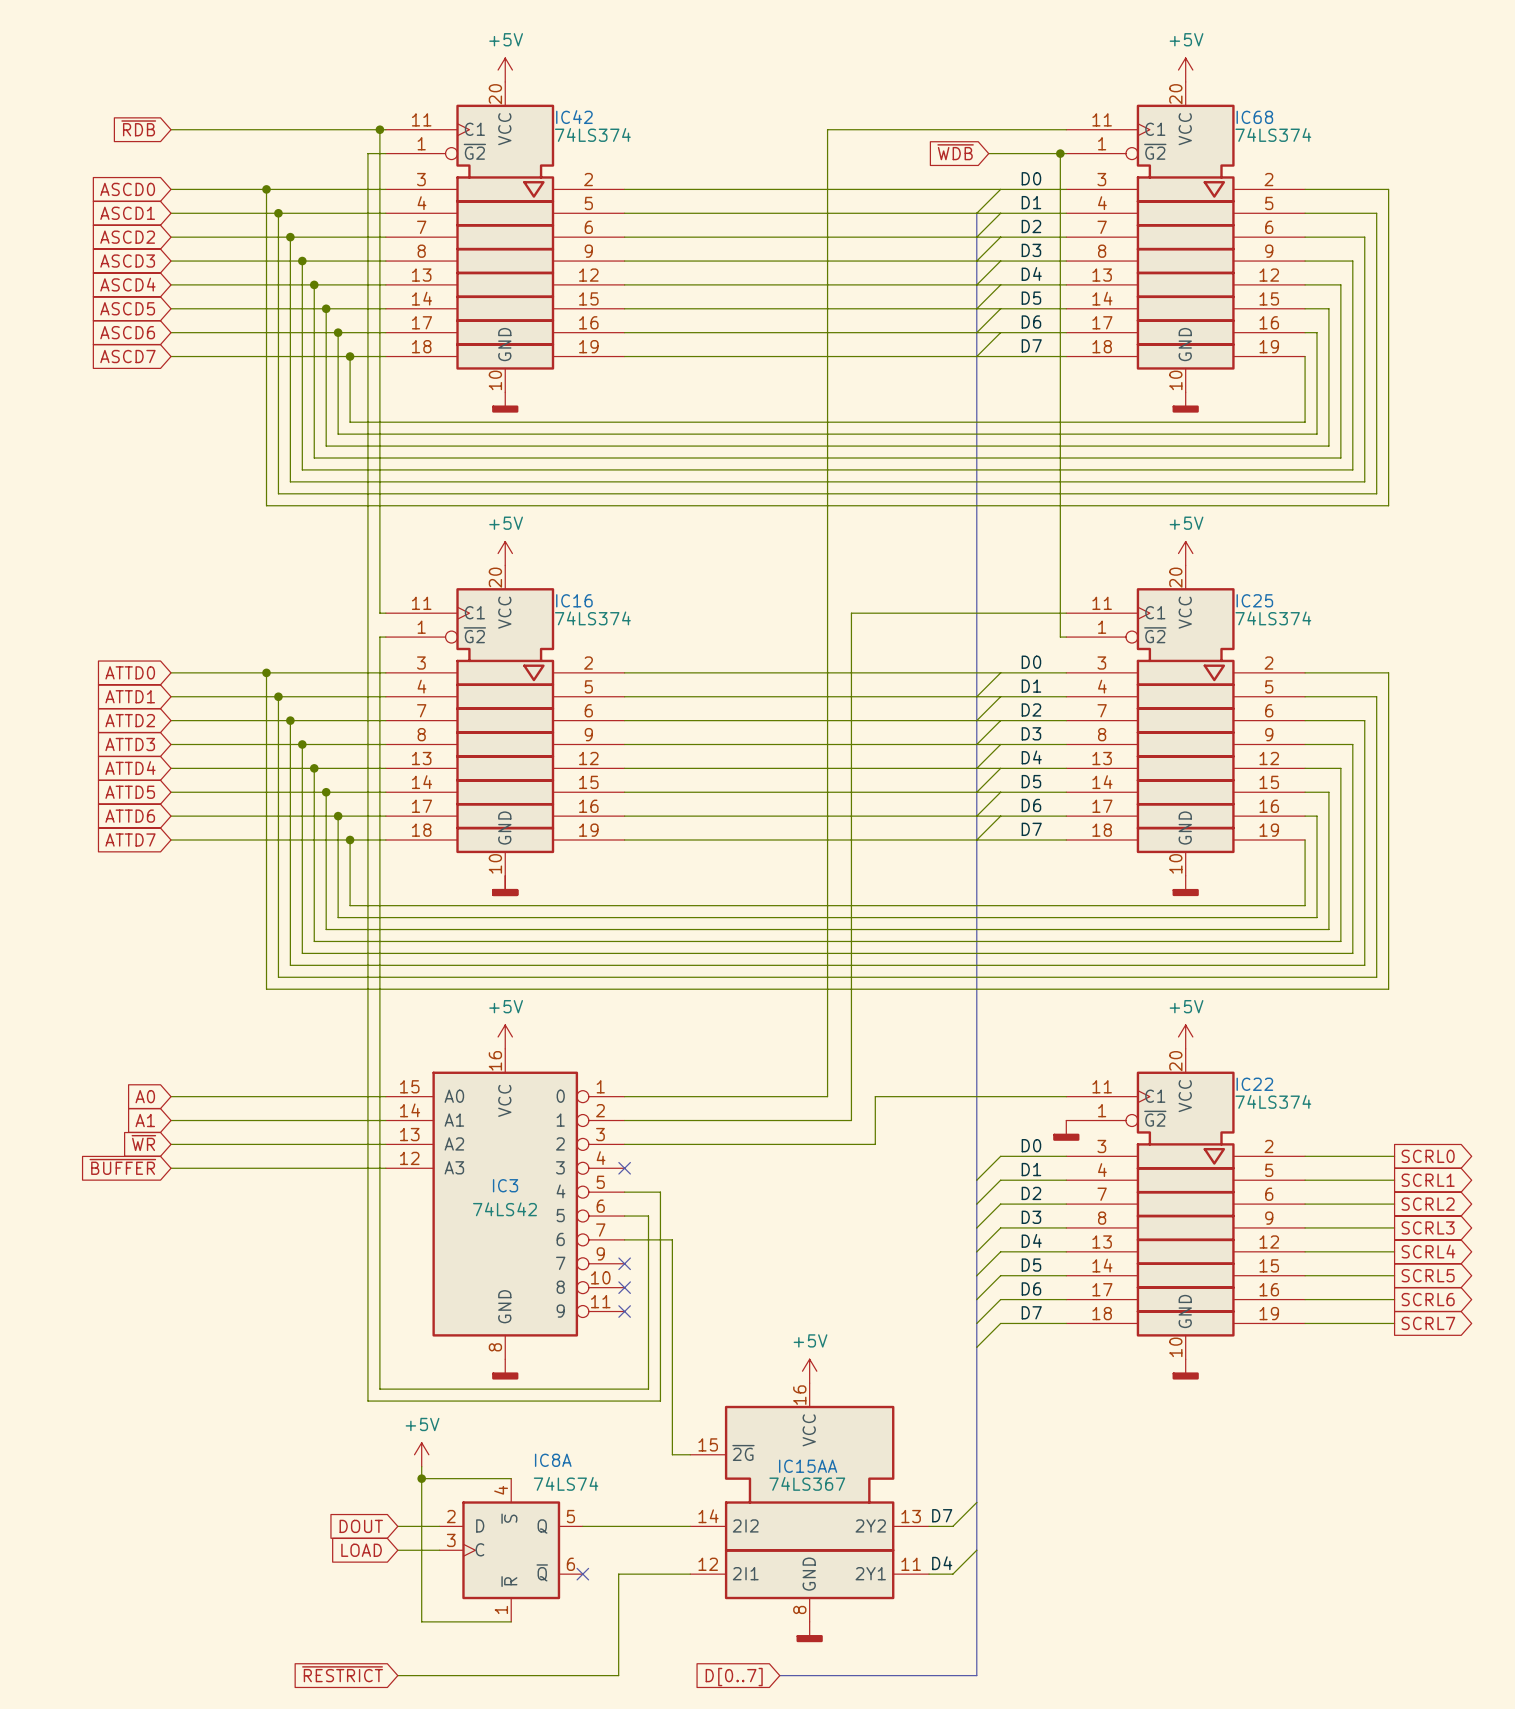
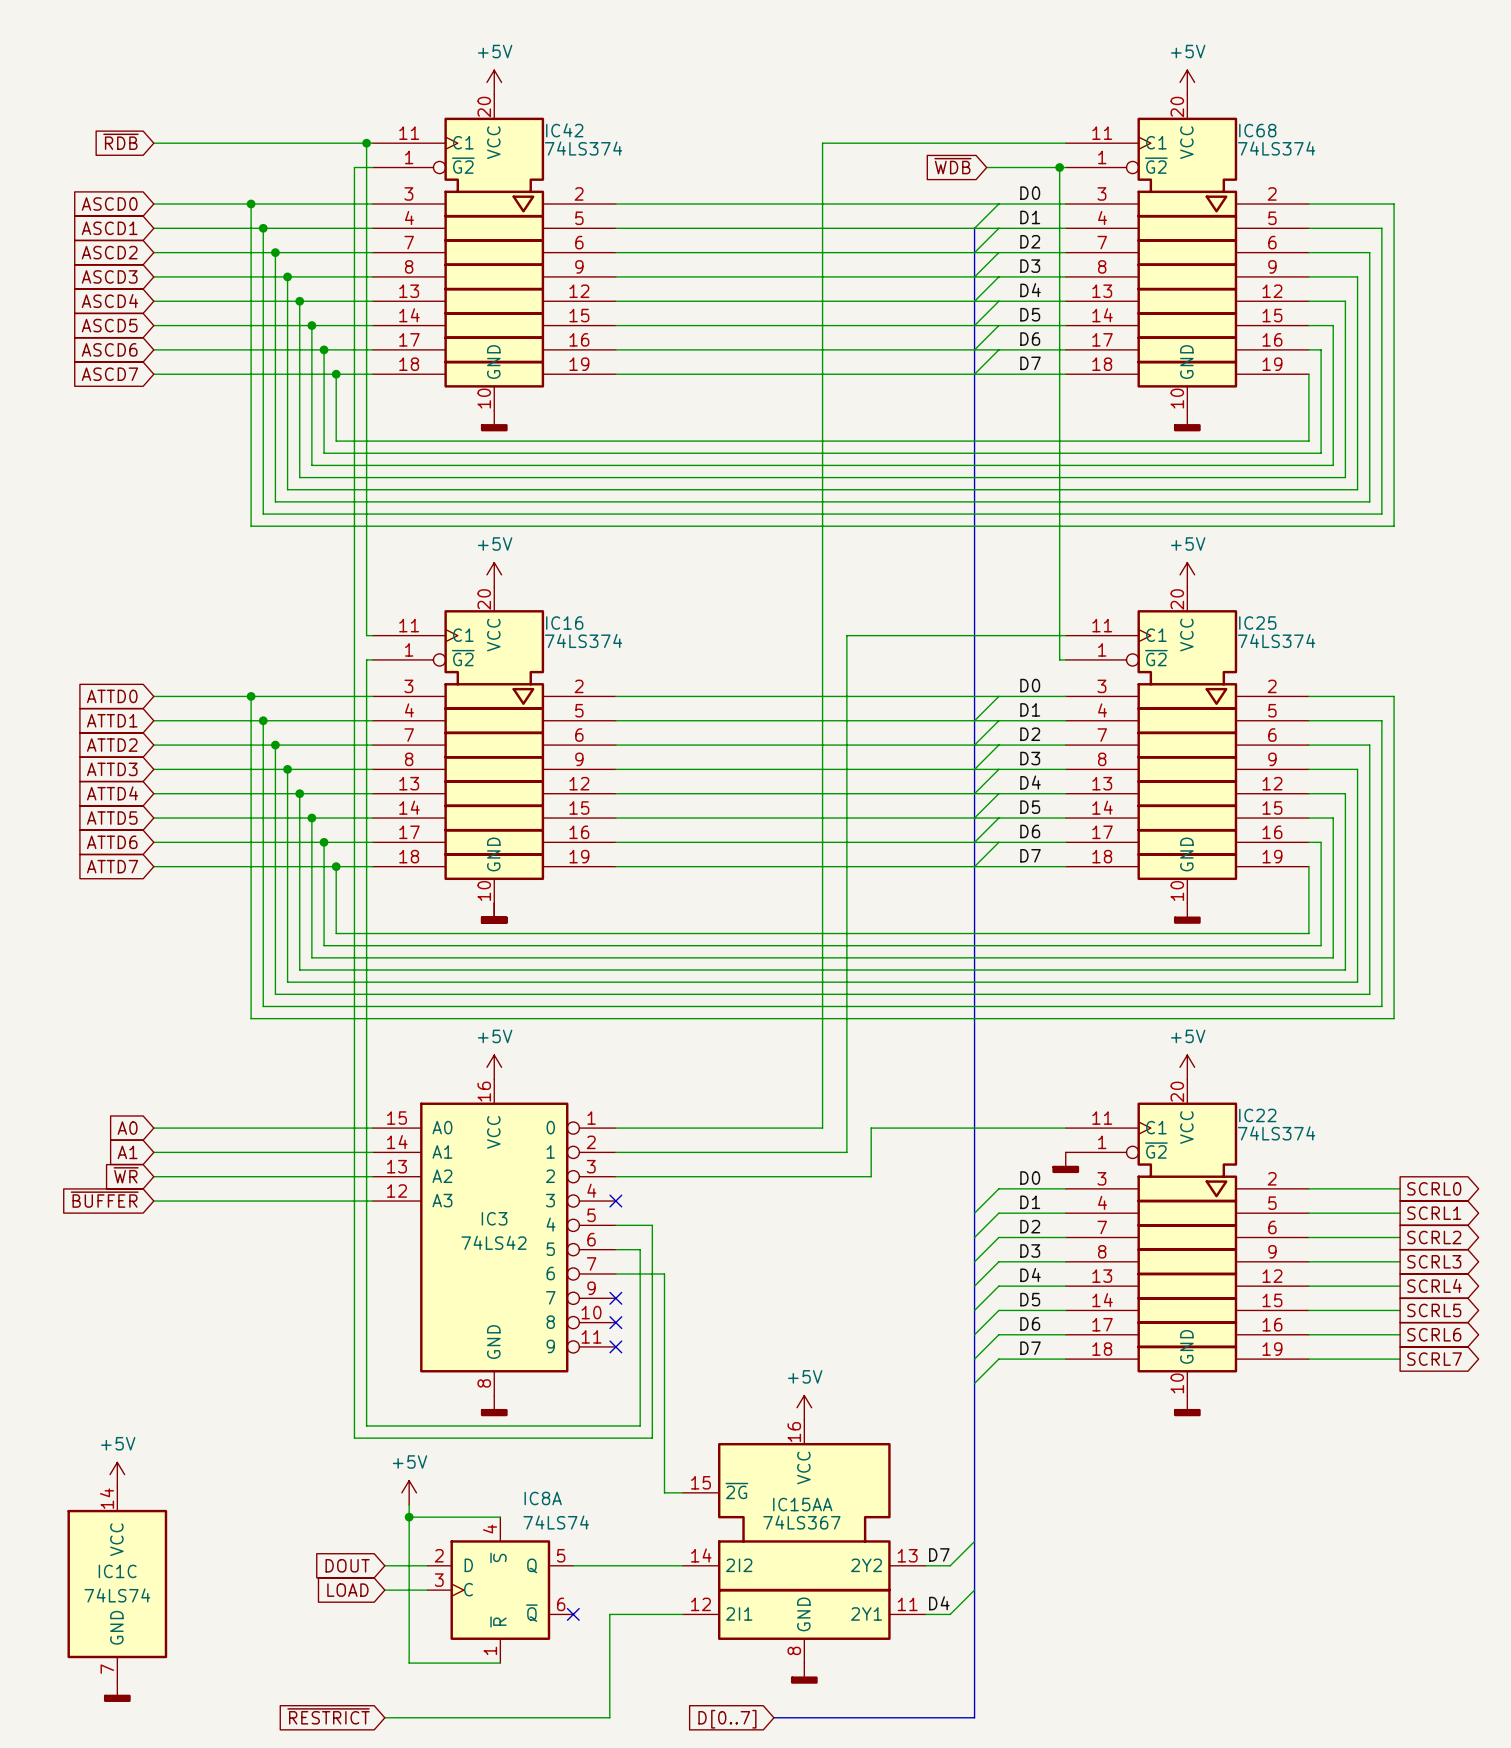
power symbol: none -> +5V (117, 1474)
IC1C: none -> 74LS74 (117, 1584)
power symbol: none -> (117, 1691)

